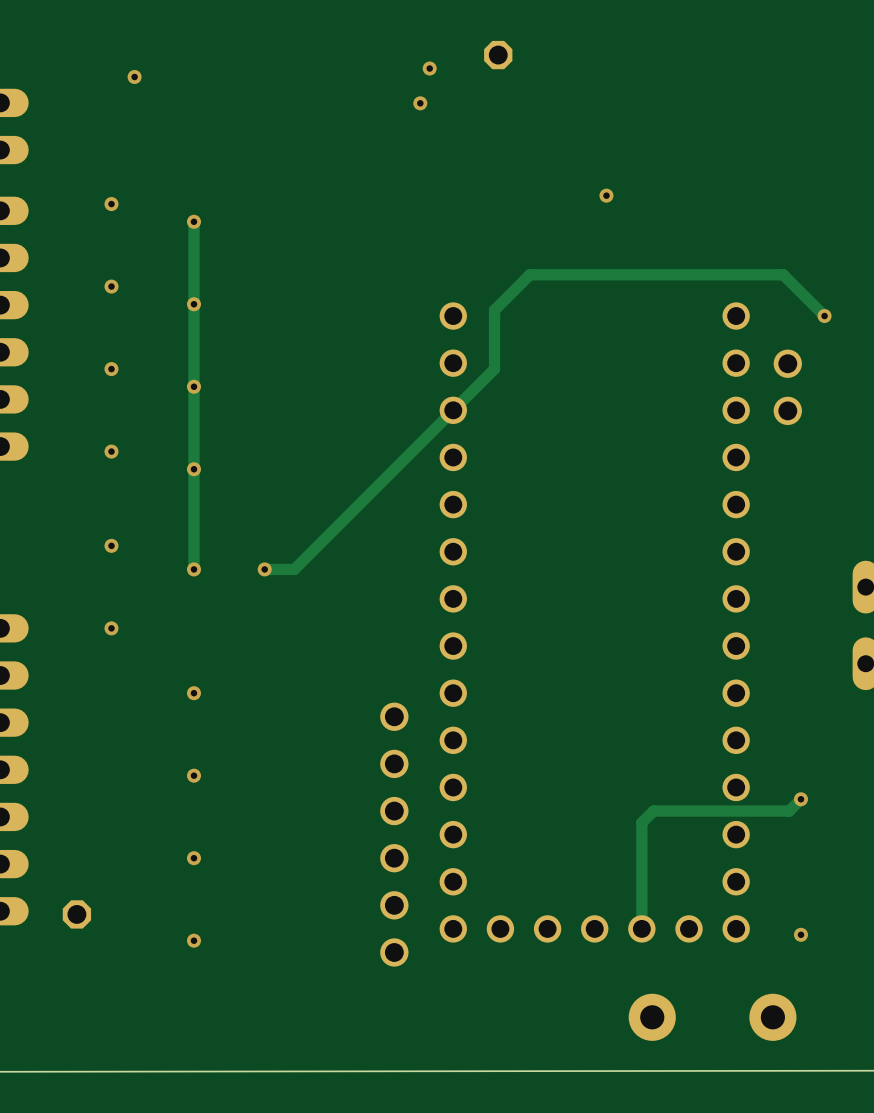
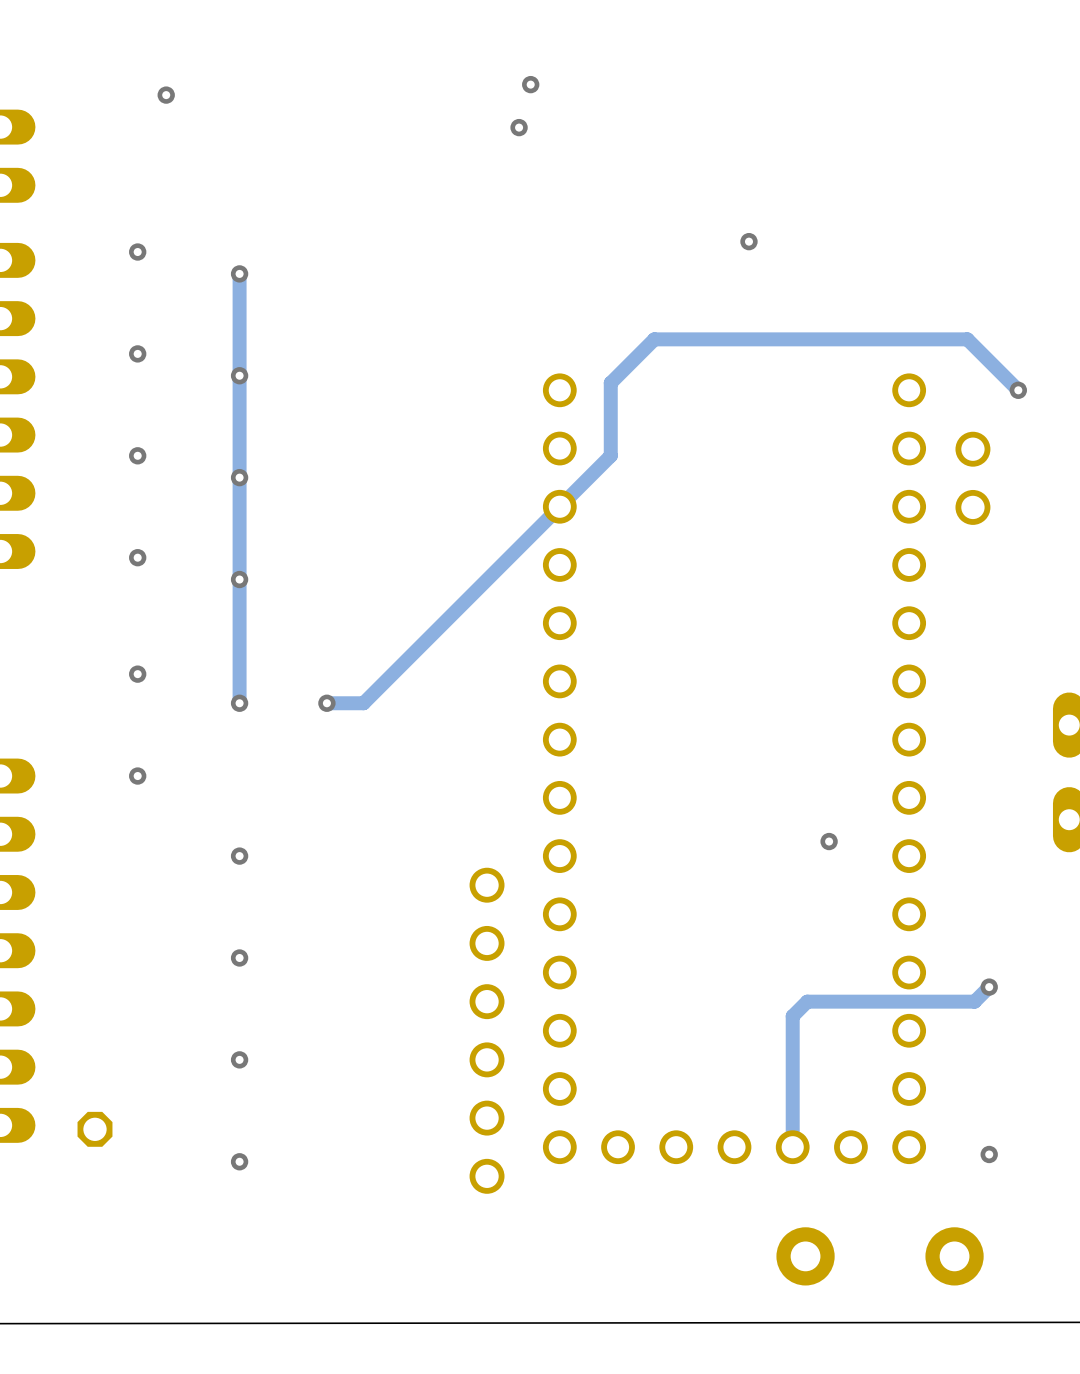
part: (498, 55) -> none
via: none -> (829, 841)

